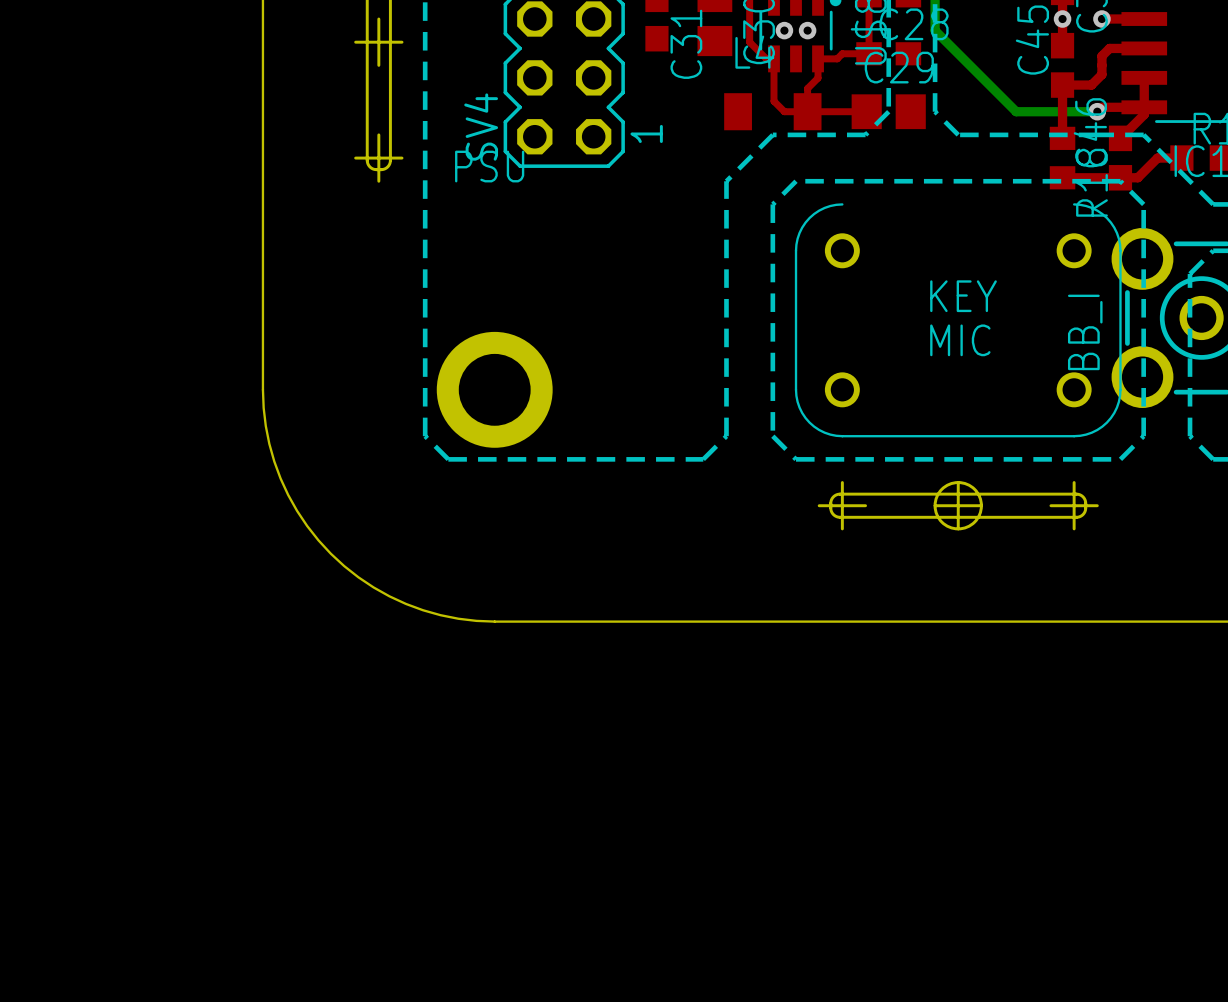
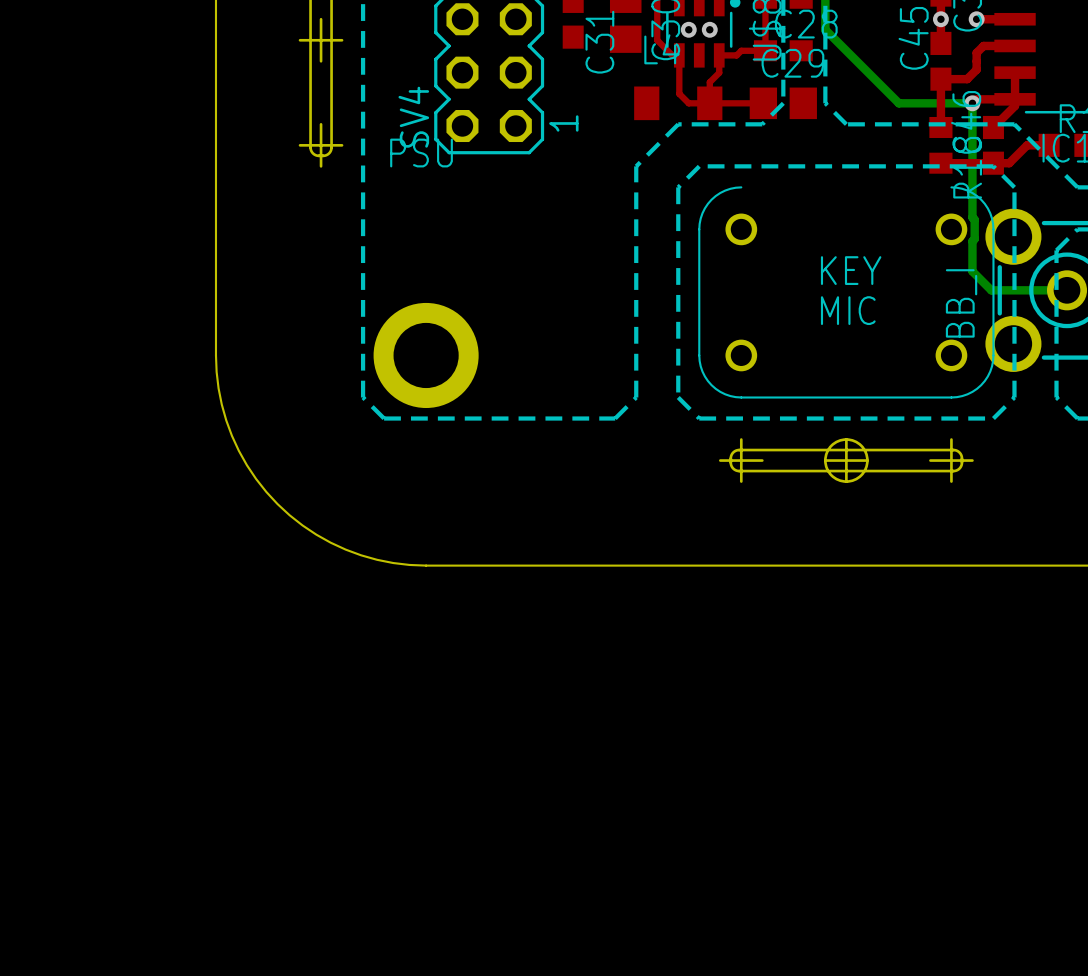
bottom track: none -> (972, 103) (972, 217) (974, 219) (972, 271) (991, 290) (1067, 290)

